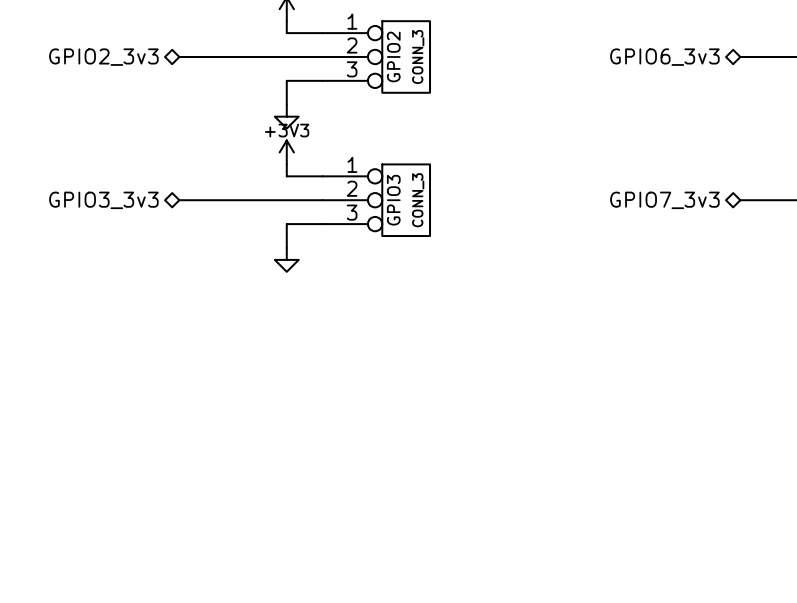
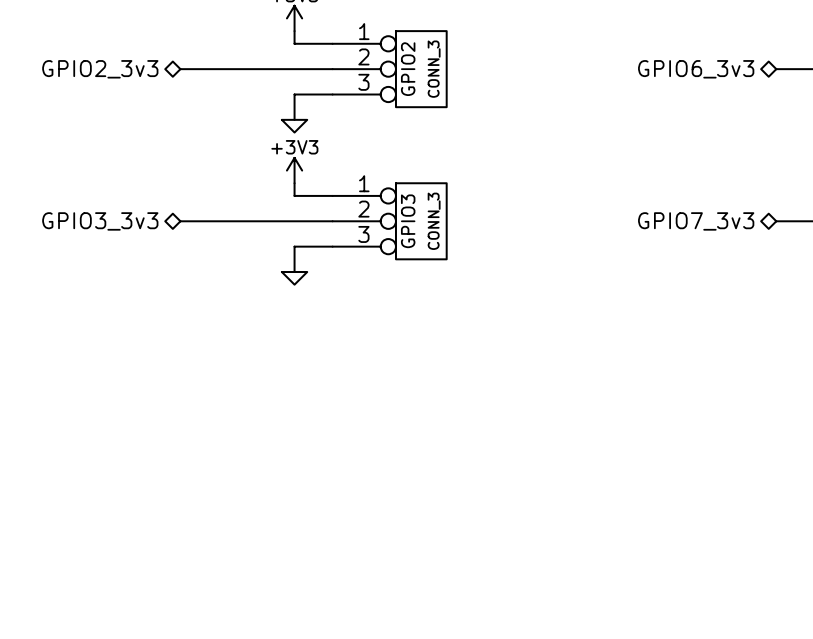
power symbol shape: [274, 104, 299, 129] -> [281, 119, 308, 133]
power symbol shape: [274, 247, 299, 272] -> [281, 272, 308, 285]

